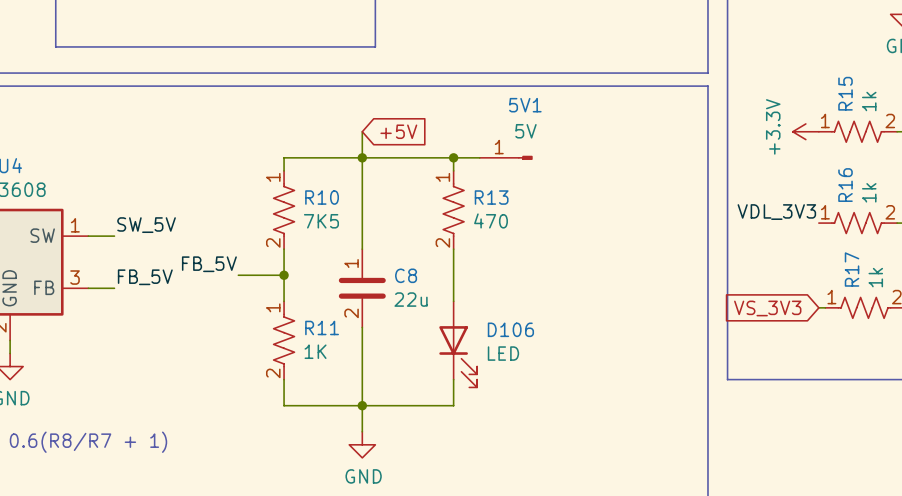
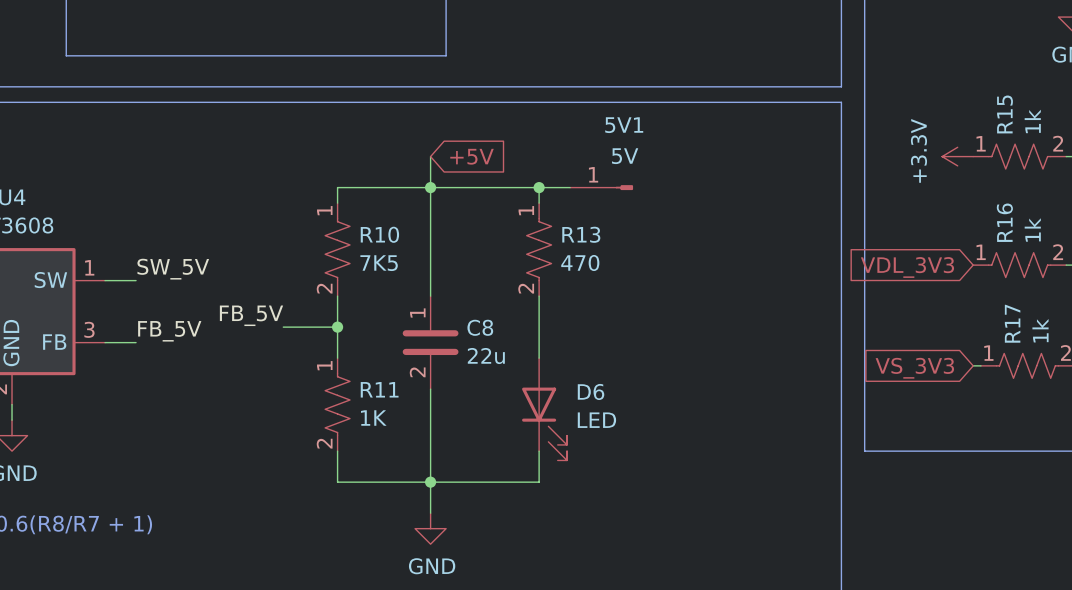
label: VDL_3V3 (776, 212) -> none
global label: none -> VDL_3V3 (907, 267)
D106 name: D106 (510, 329) -> D6 (591, 391)

